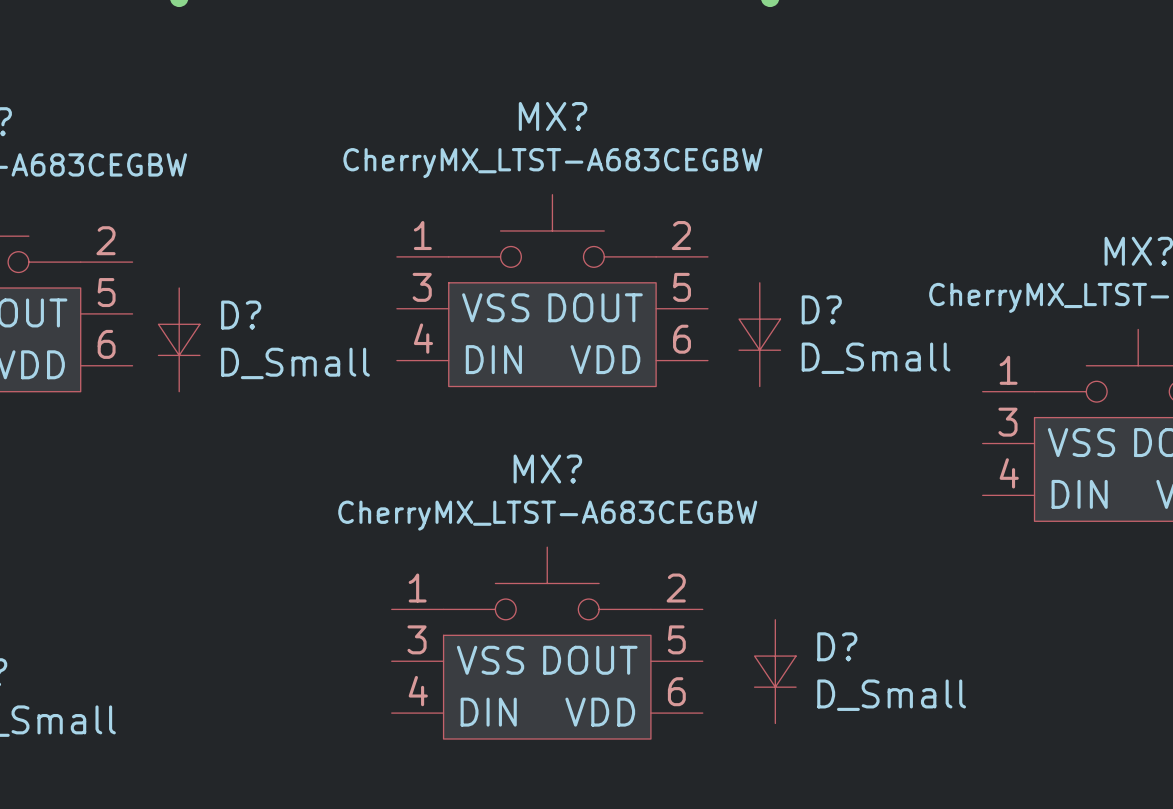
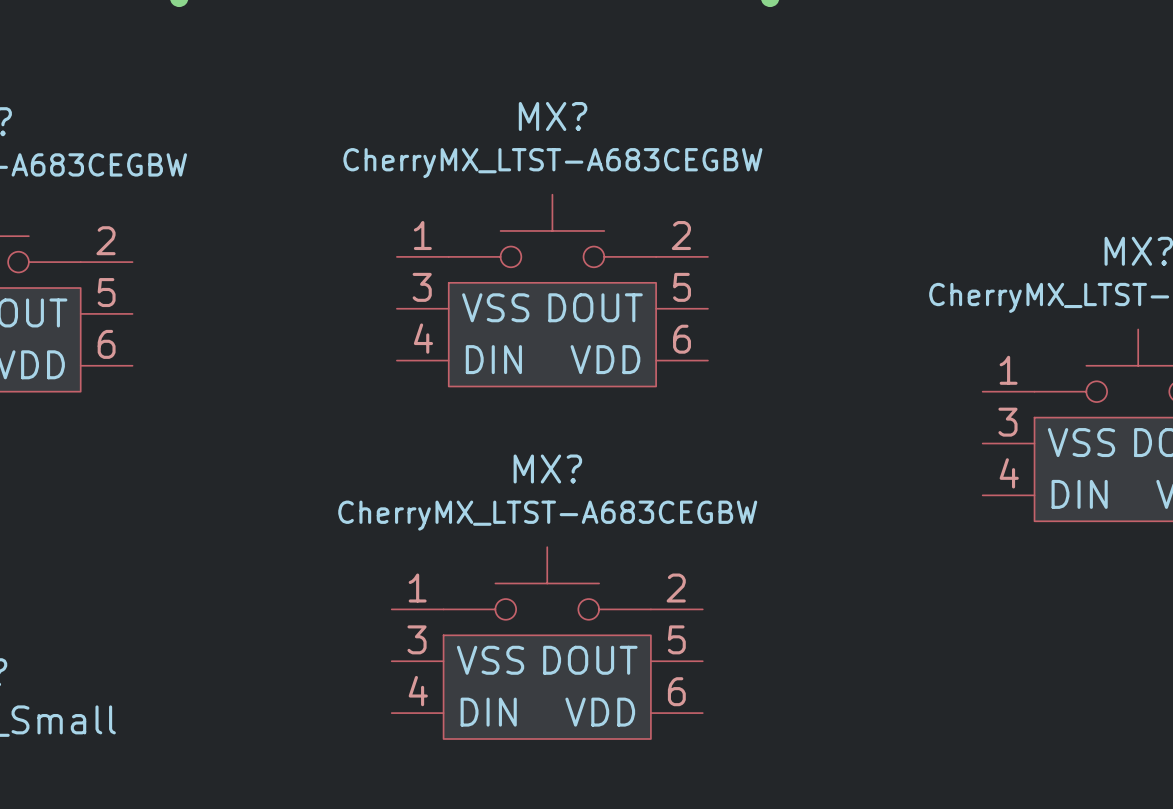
D?: D_Small (759, 334) -> none
D?: D_Small (179, 339) -> none
D?: D_Small (775, 671) -> none

